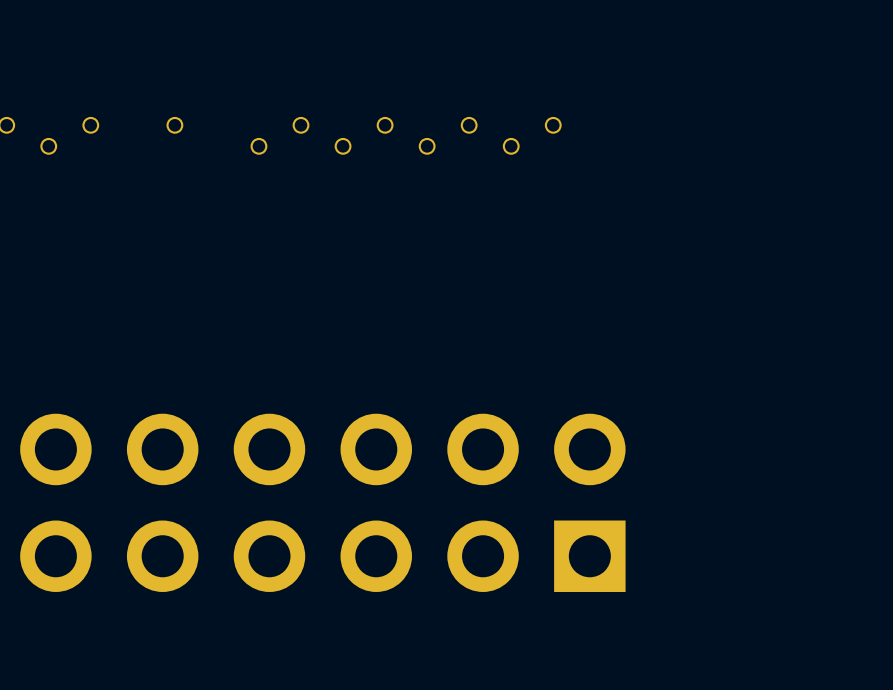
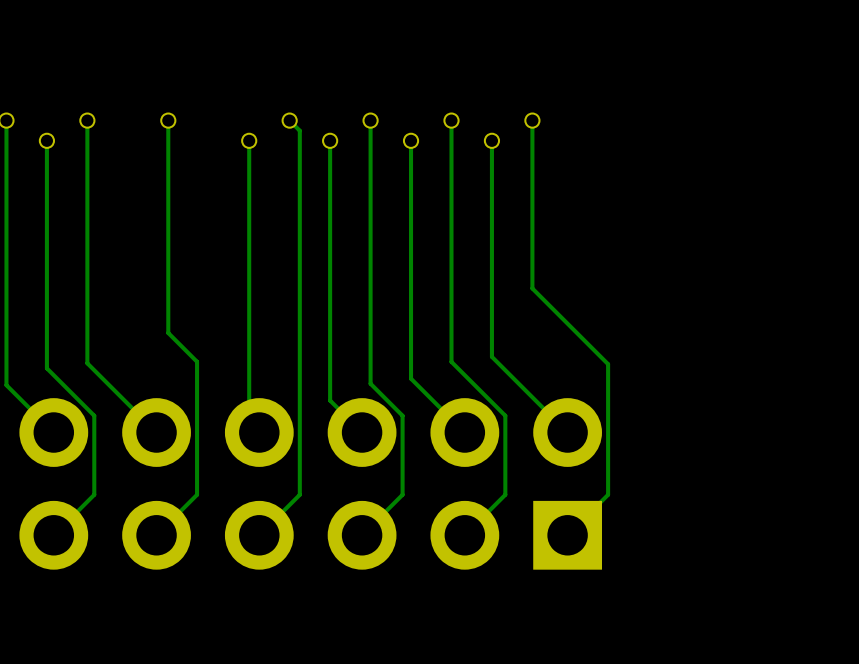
bottom track: none -> (6, 120) (6, 385) (53, 432)
bottom track: none -> (87, 120) (87, 363) (156, 432)
bottom track: none -> (168, 120) (168, 332) (197, 361) (197, 494) (156, 535)
bottom track: none -> (289, 120) (299, 130) (299, 494) (259, 535)
bottom track: none -> (370, 120) (370, 383) (402, 415) (402, 494) (362, 535)
bottom track: none -> (451, 120) (451, 361) (505, 415) (505, 494) (464, 535)
bottom track: none -> (532, 120) (532, 288) (608, 364) (608, 494) (567, 535)
bottom track: none -> (46, 140) (46, 368) (94, 415) (94, 494) (53, 535)
bottom track: none -> (249, 140) (249, 422) (259, 432)
bottom track: none -> (330, 140) (330, 400) (362, 432)
bottom track: none -> (411, 140) (411, 378) (464, 432)
bottom track: none -> (491, 140) (491, 356) (567, 432)

